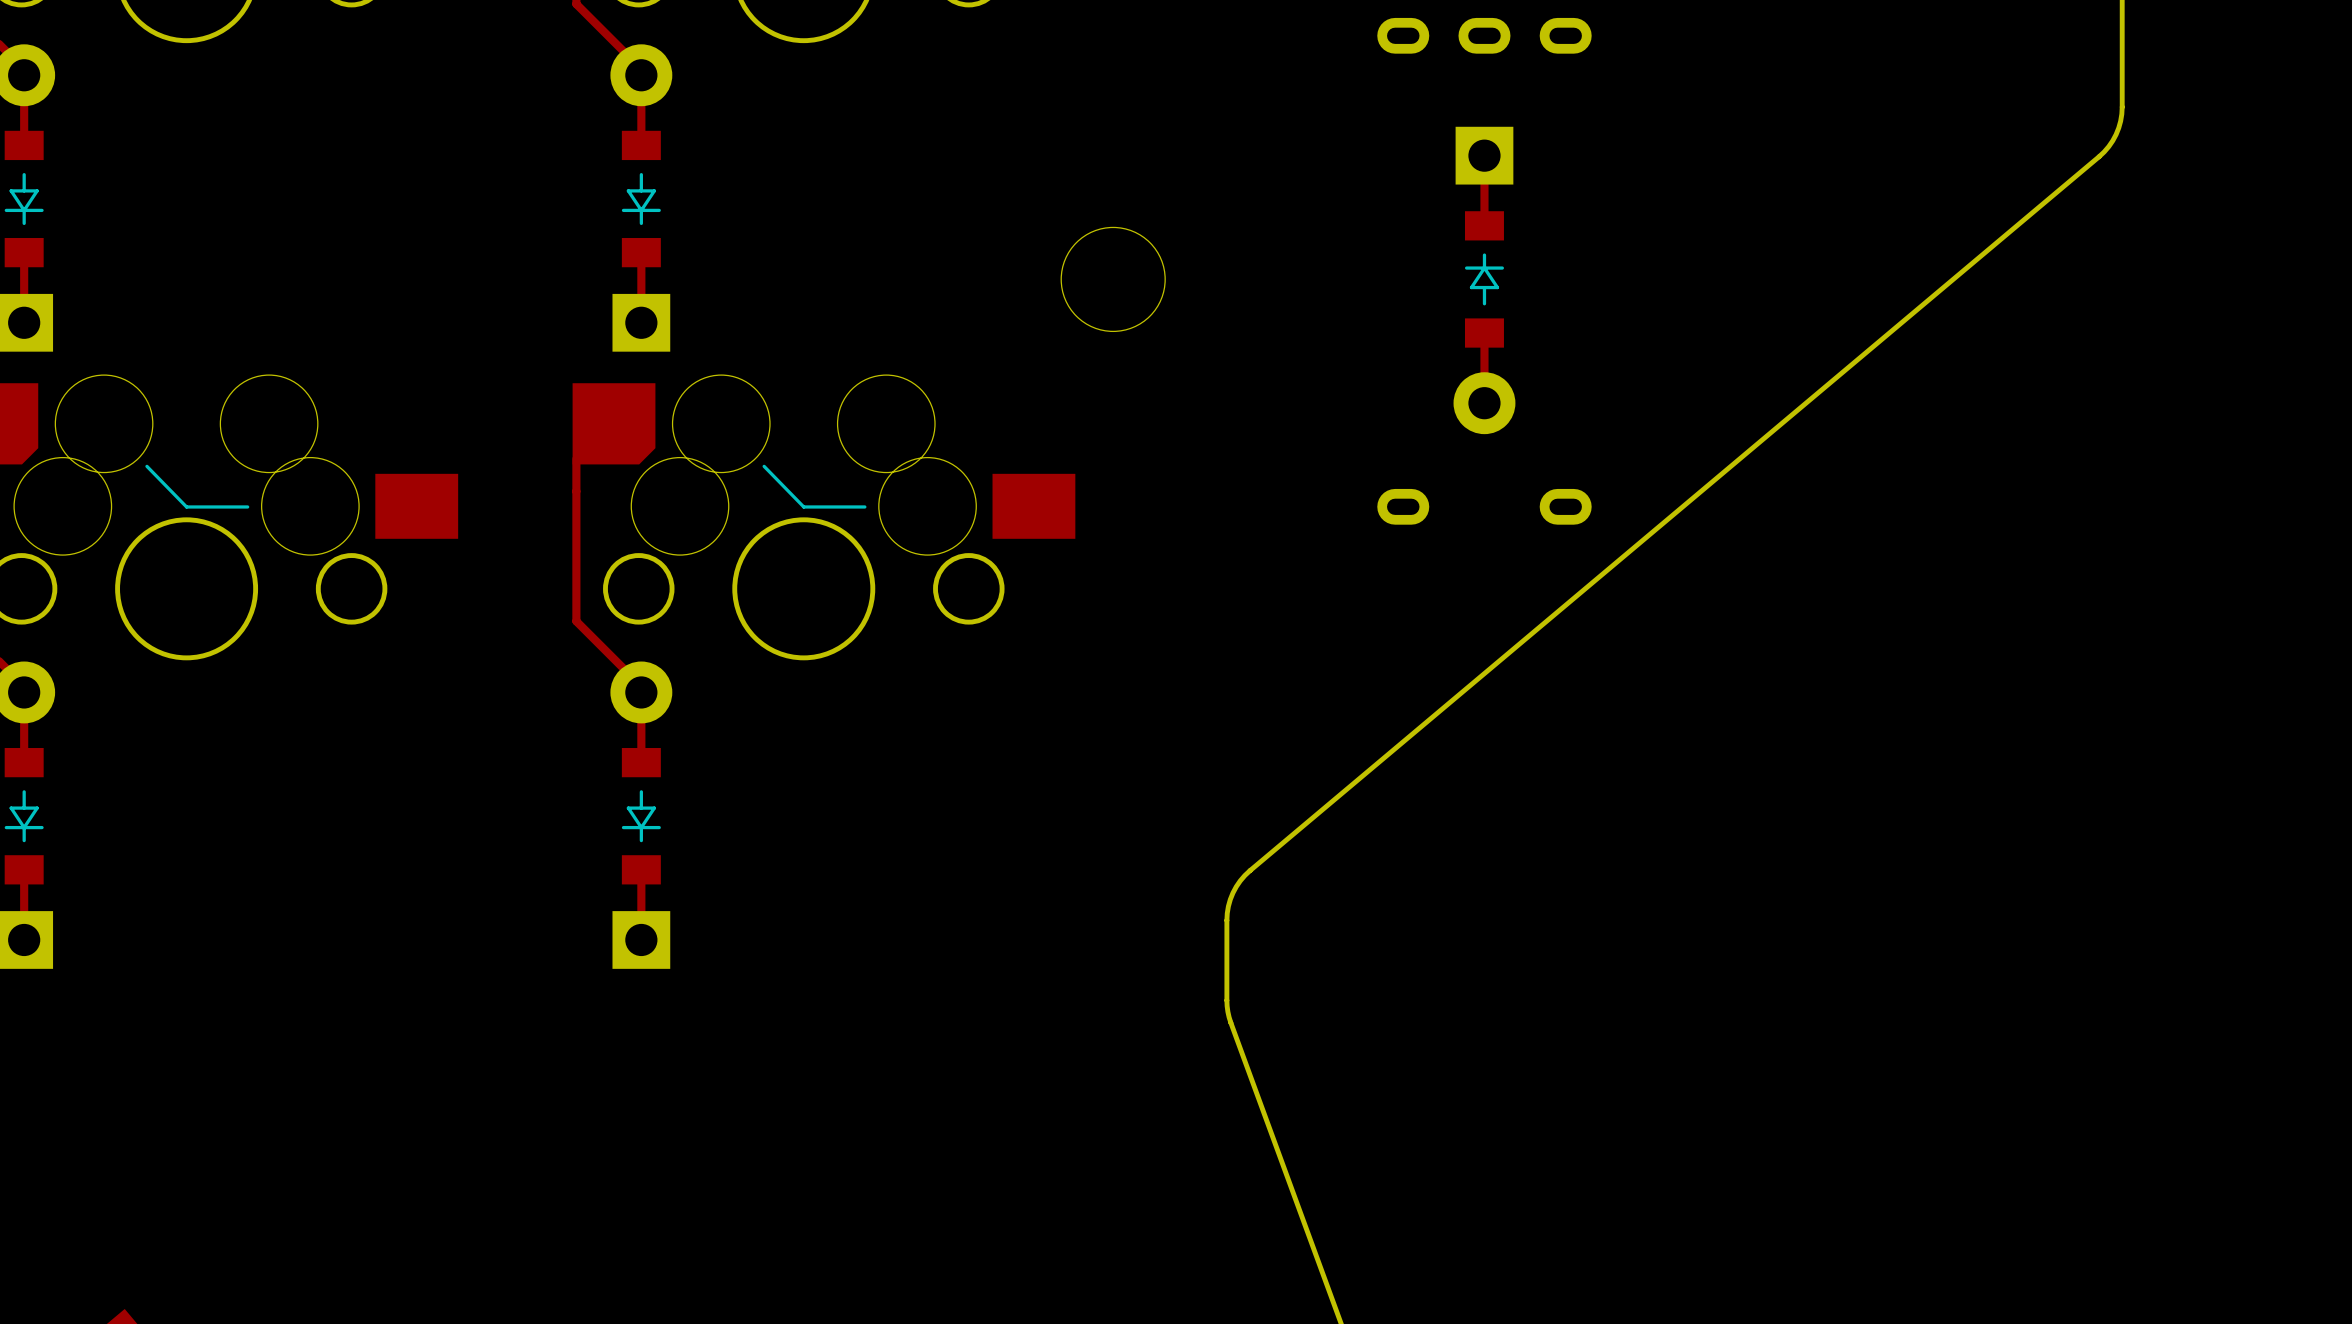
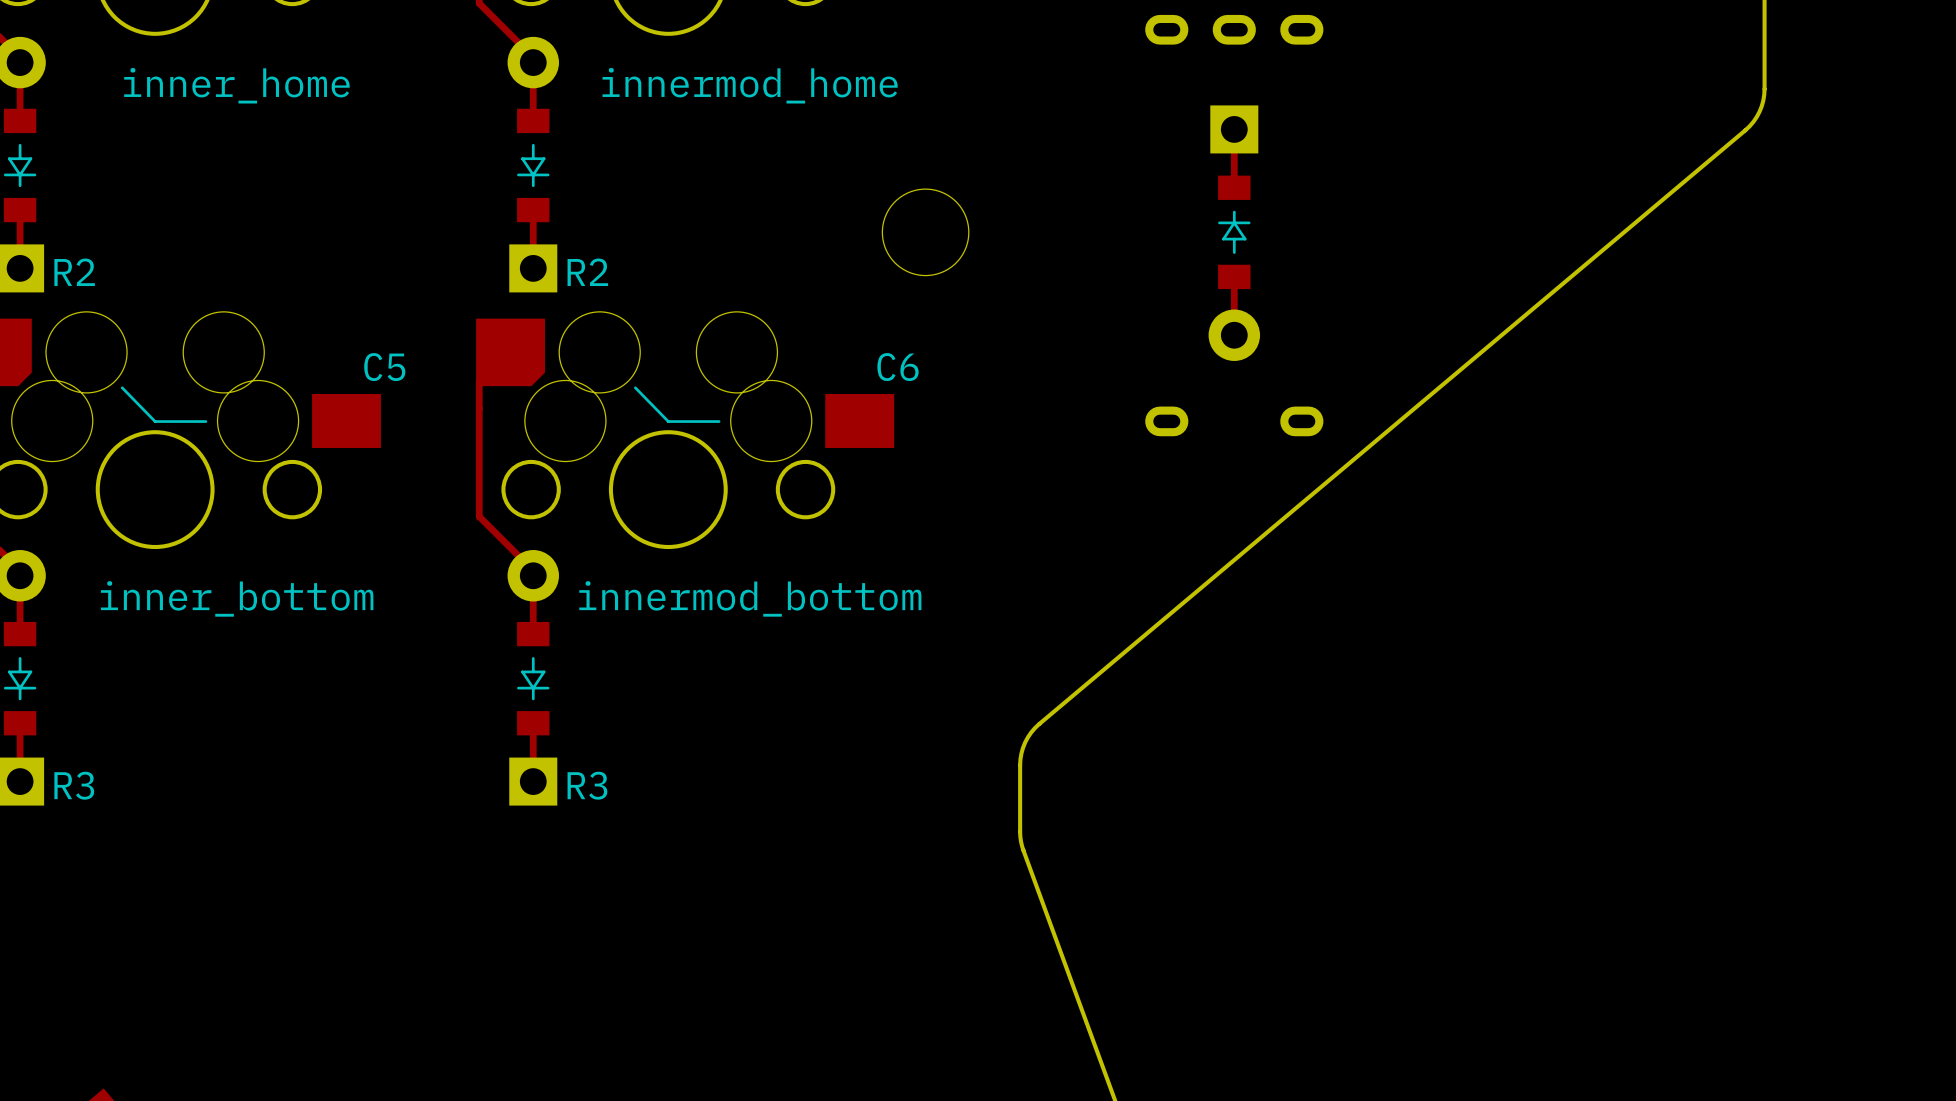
text: none -> inner_home (236, 85)
text: none -> innermod_home (750, 85)
text: none -> R2 (74, 272)
text: none -> R2 (587, 272)
text: none -> C5 (384, 367)
text: none -> C6 (898, 367)
text: none -> inner_bottom (237, 598)
text: none -> innermod_bottom (750, 598)
text: none -> R3 (74, 785)
text: none -> R3 (587, 785)

